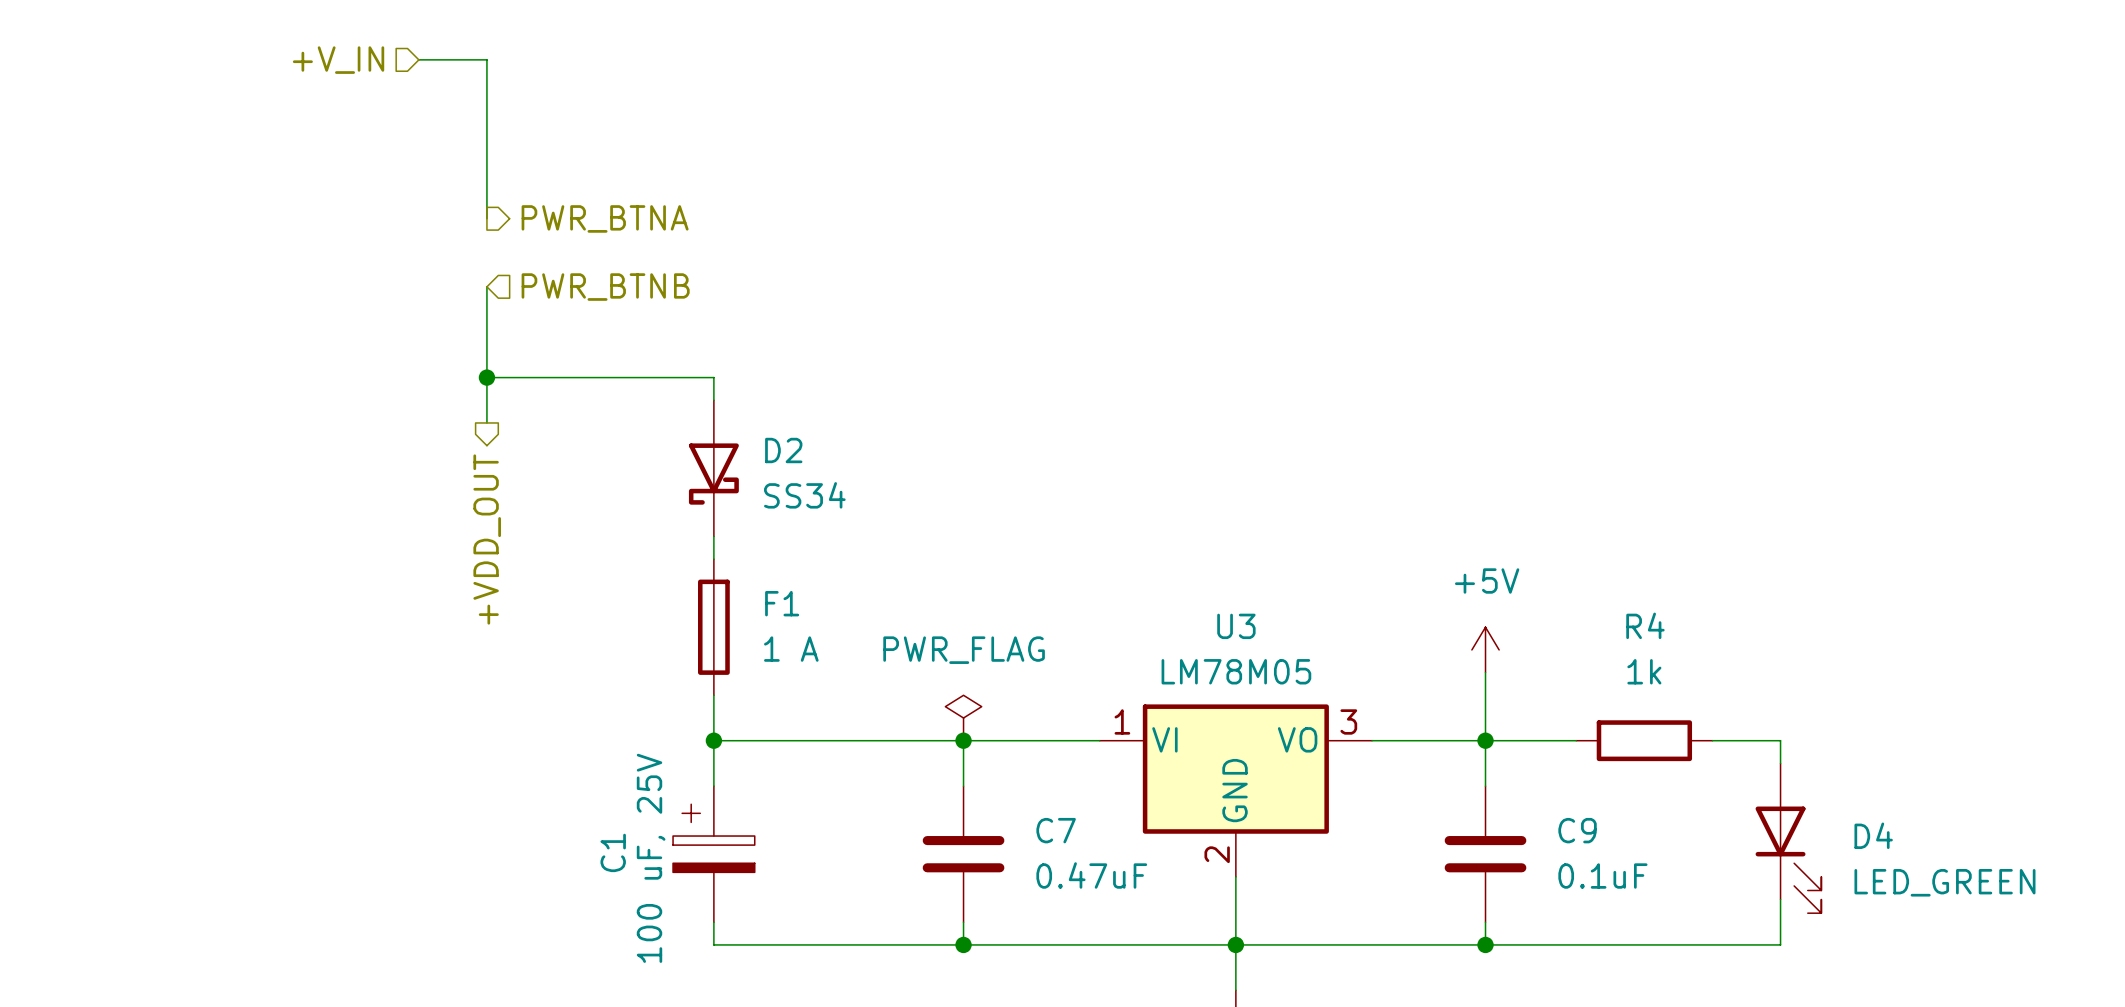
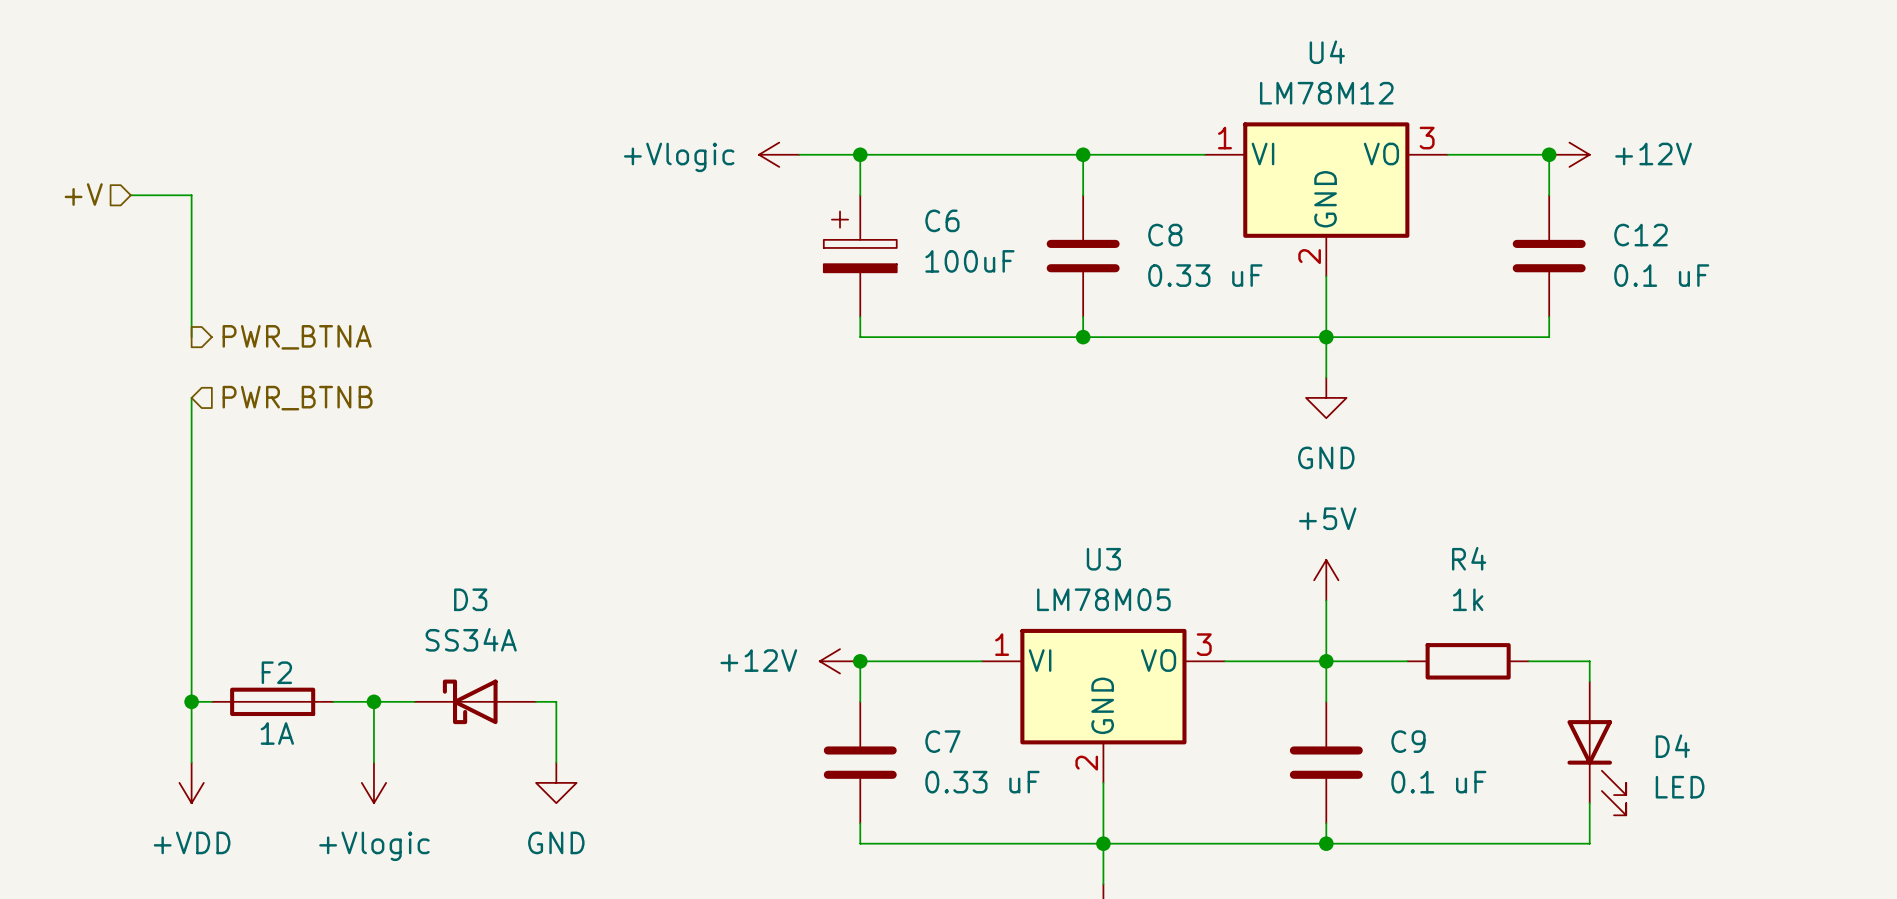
wire: (418, 59) (486, 59) (486, 218) -> (130, 195) (191, 195) (191, 337)
hierarchical label: +V_IN (338, 60) -> none
power symbol: none -> +Vlogic (779, 154)
wire: none -> (799, 154) (1204, 154)
wire: none -> (860, 154) (860, 195)
junction: none -> (860, 154)
wire: none -> (1083, 154) (1083, 195)
junction: none -> (1083, 154)
wire: none -> (1447, 154) (1549, 154) (1549, 195)
junction: none -> (1549, 154)
power symbol: none -> +12V (1569, 154)
hierarchical label: none -> +V (83, 194)
hierarchical label position: PWR_BTNA (605, 218) -> PWR_BTNA (297, 337)
U4: none -> LM78M12 (1326, 199)
wire: (486, 286) (486, 422) -> none
C6: none -> 100uF (860, 256)
C8: none -> 0.33 uF (1083, 256)
C12: none -> 0.1 uF (1549, 256)
hierarchical label position: PWR_BTNB (605, 287) -> PWR_BTNB (297, 398)
wire: none -> (1326, 276) (1326, 377)
wire: none -> (860, 316) (860, 337) (1549, 337) (1549, 316)
wire: none -> (1083, 316) (1083, 337)
wire: (486, 377) (713, 377) (713, 400) -> none
junction: (486, 377) -> none
junction: none -> (1083, 337)
junction: none -> (1326, 337)
wire: none -> (191, 397) (191, 762)
power symbol: none -> GND (1326, 397)
D2: SS34 (713, 468) -> none
wire: (713, 536) (713, 559) -> none
hierarchical label: +VDD_OUT (487, 539) -> none
F1: 1 A (713, 627) -> none
wire: (713, 695) (713, 786) -> none
power symbol: PWR_FLAG (963, 718) -> none
wire: (713, 740) (963, 740) -> none
junction: (713, 740) -> none
power symbol: none -> +12V (840, 661)
wire: none -> (191, 701) (211, 701)
junction: none -> (191, 701)
F2: none -> 1A (272, 701)
wire: none -> (333, 701) (414, 701)
wire: none -> (373, 701) (373, 762)
junction: none -> (373, 701)
D3: none -> SS34A (475, 701)
wire: none -> (536, 701) (556, 701) (556, 762)
C1: 100 uF, 25V (713, 854) -> none
C7 value: 0.47uF (1091, 875) -> 0.33 uF (982, 782)
power symbol: none -> +VDD (191, 782)
power symbol: none -> +Vlogic (373, 782)
power symbol: none -> GND (556, 782)
C9 value: 0.1uF (1602, 876) -> 0.1 uF (1438, 782)
D4 value: LED_GREEN (1944, 882) -> LED (1680, 787)
wire: (713, 922) (713, 944) (963, 944) -> none
junction: (963, 944) -> none

